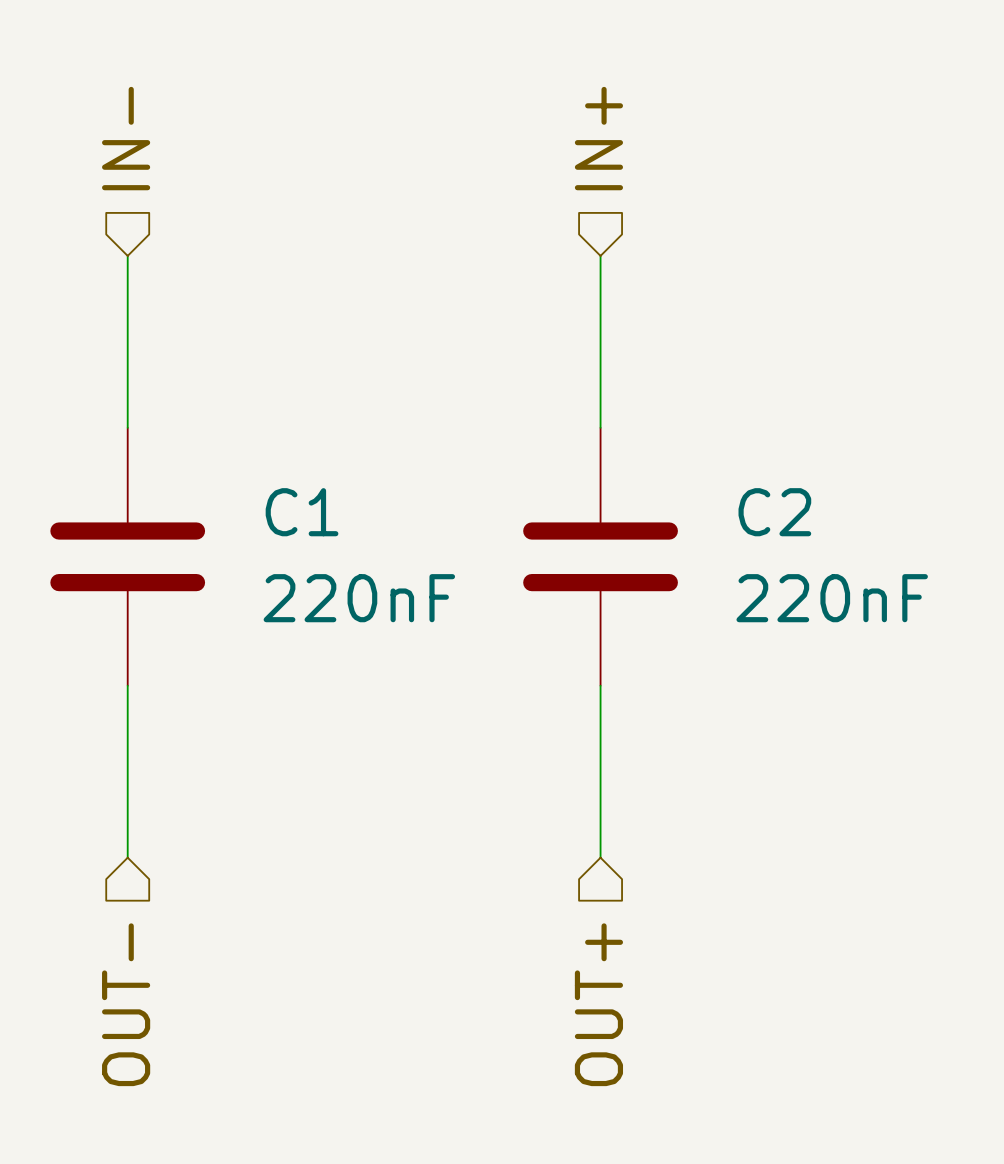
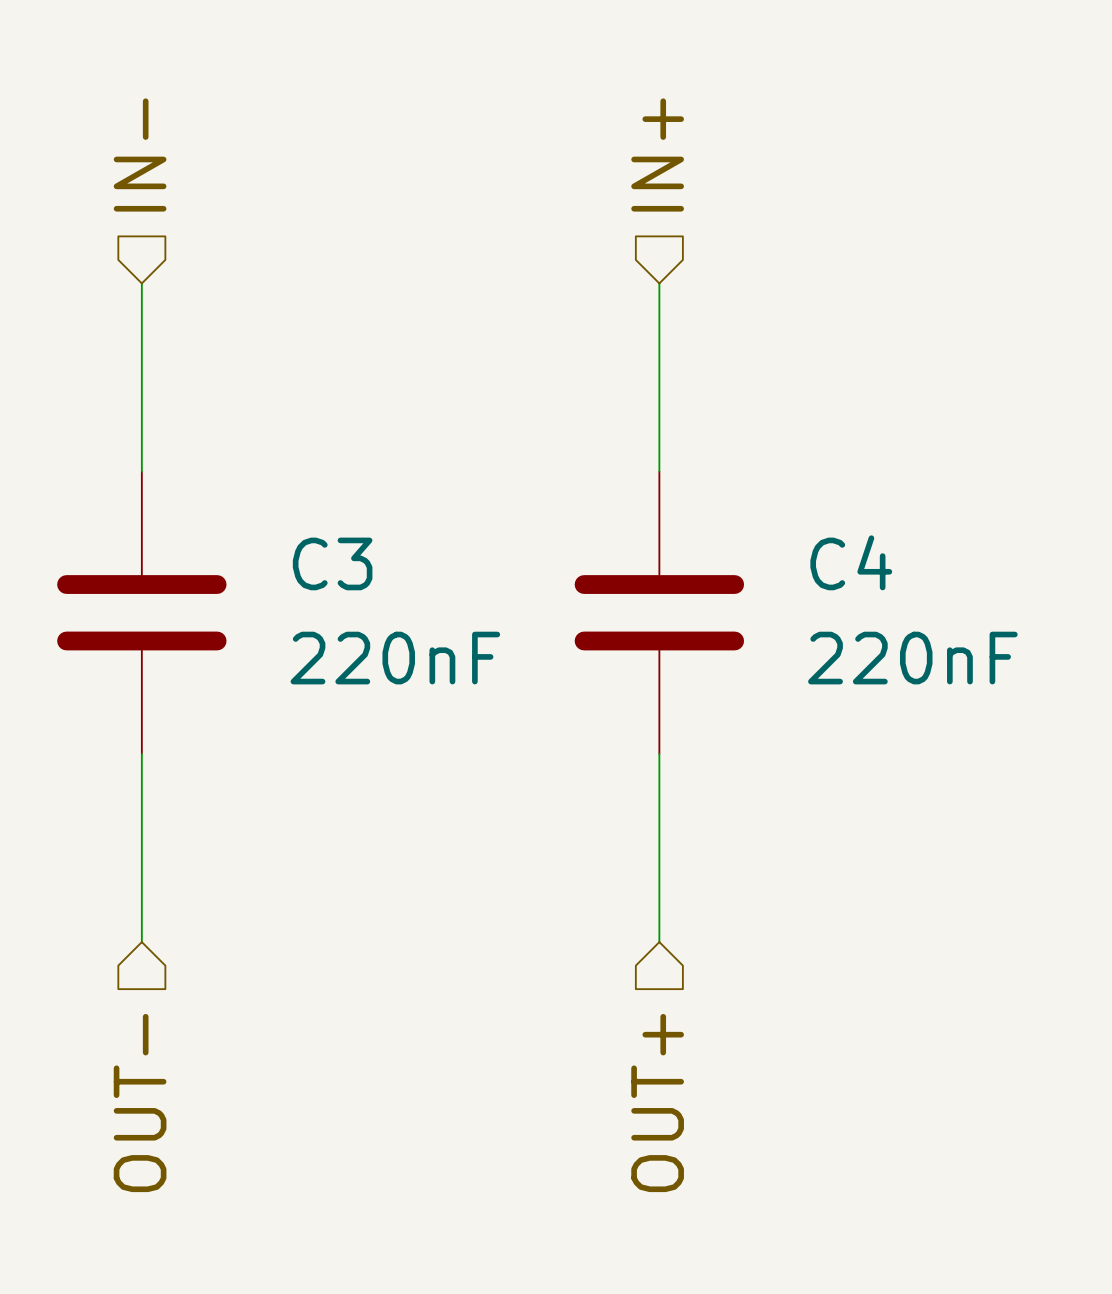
C1 name: C1 (302, 512) -> C3 (332, 563)
C2 name: C2 (774, 512) -> C4 (851, 562)

